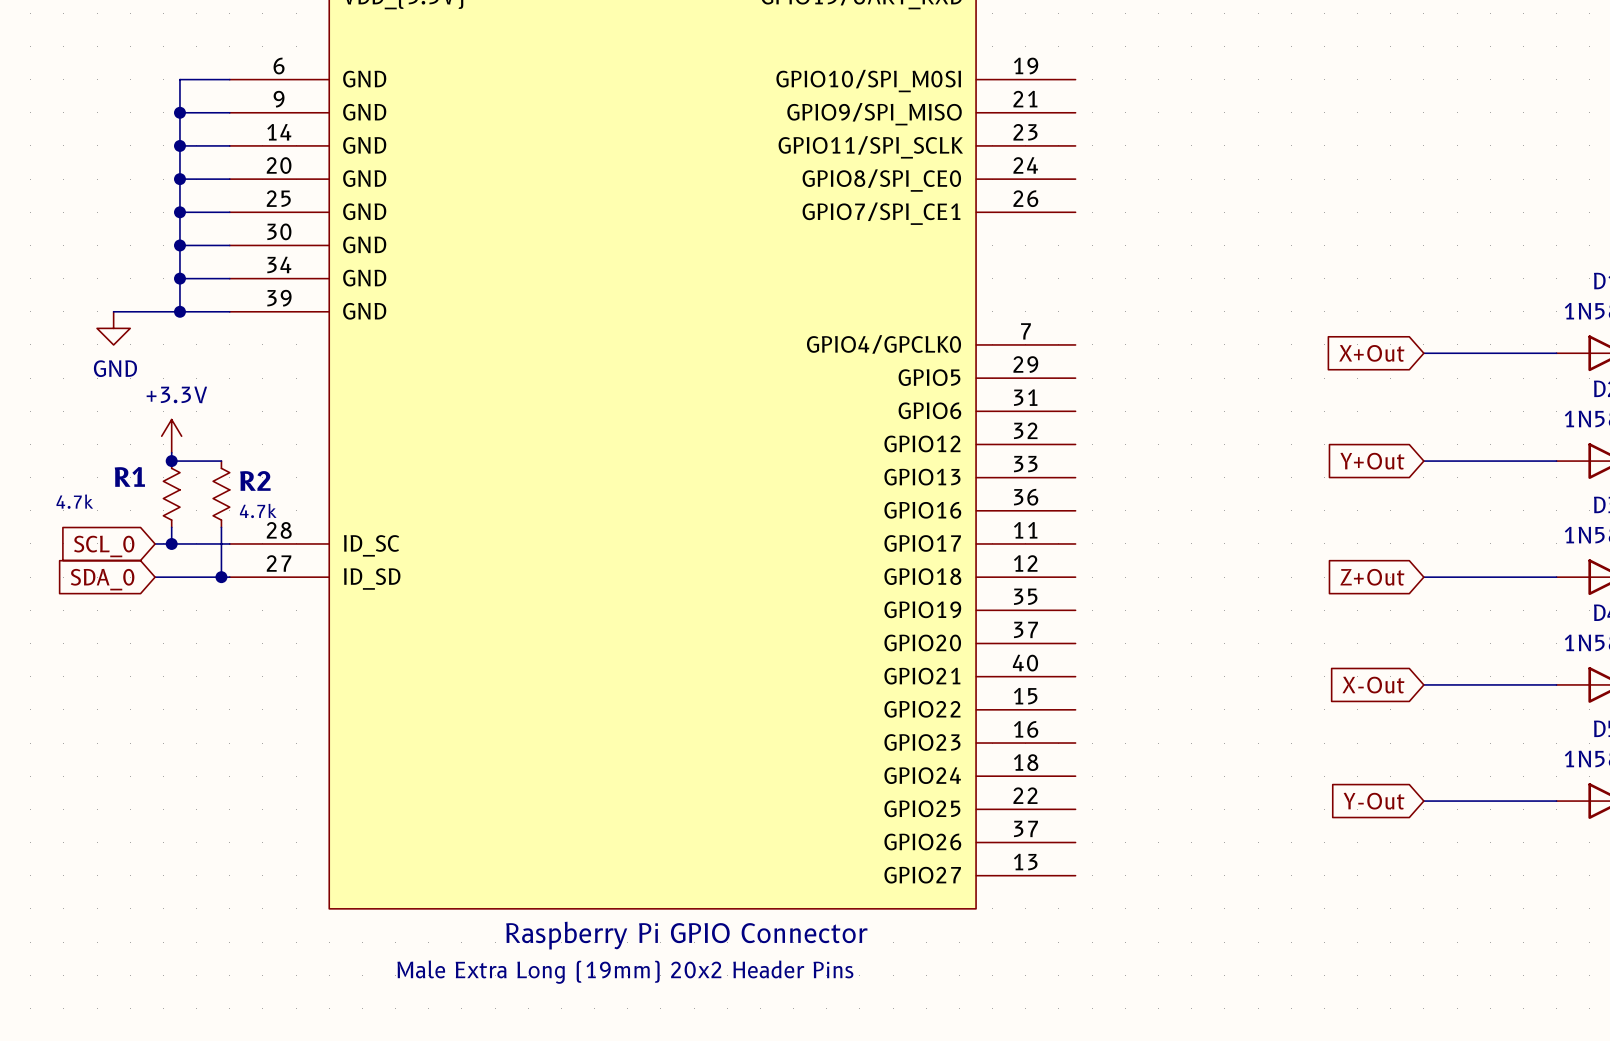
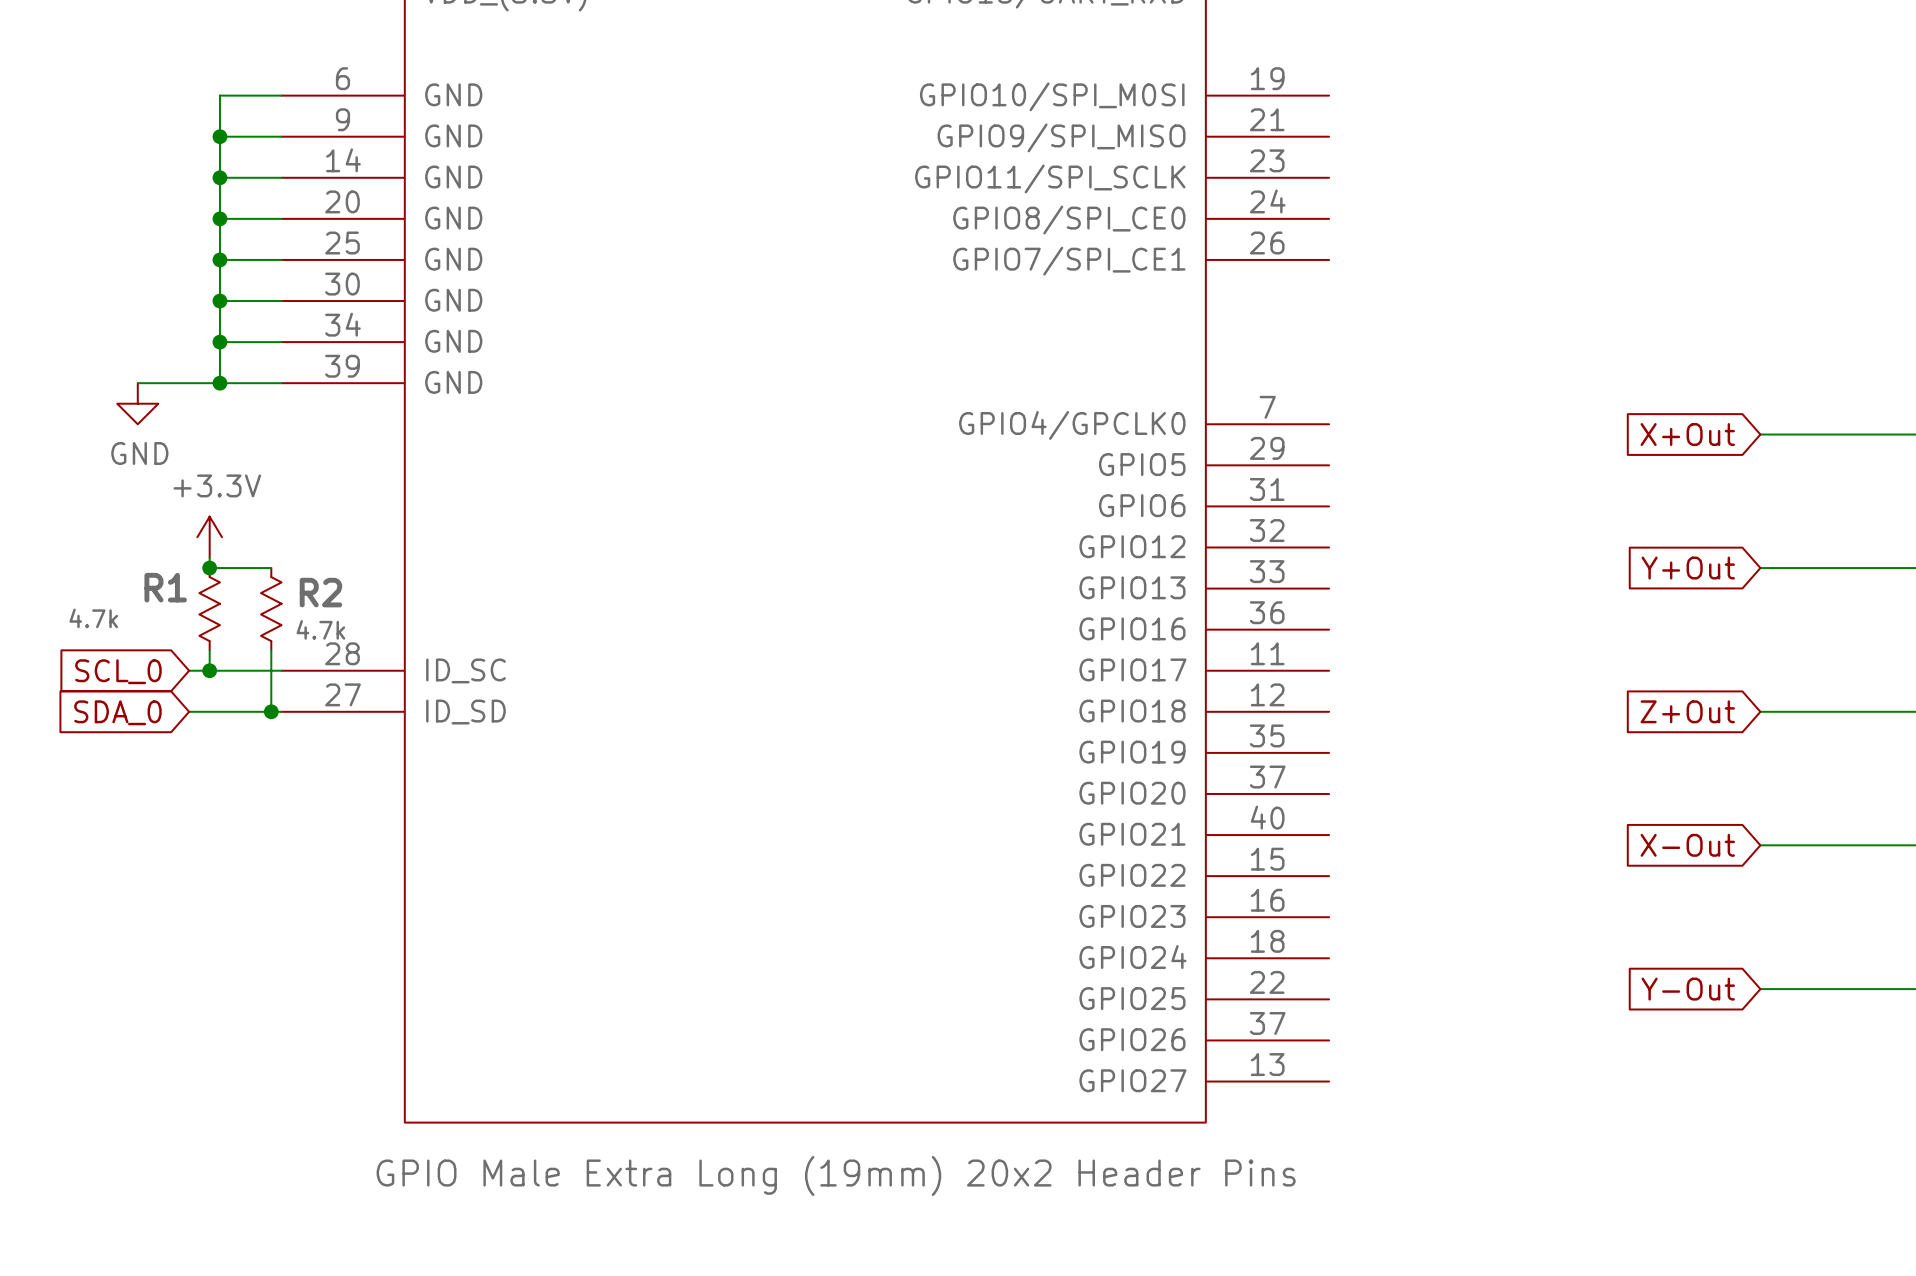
part value: Raspberry Pi GPIO Connector (686, 935) -> GPIO Male Extra Long (19mm) 20x2 Header Pins (836, 1175)
text: Male Extra Long (19mm) 20x2 Header Pins (625, 972) -> none

